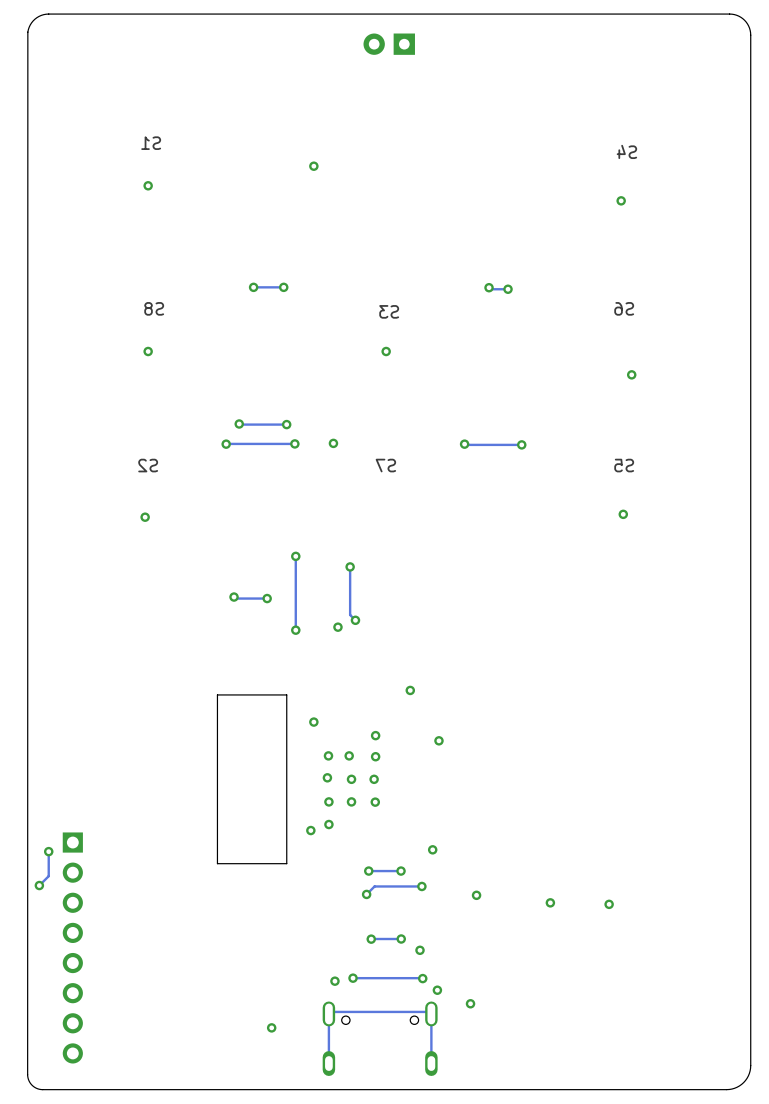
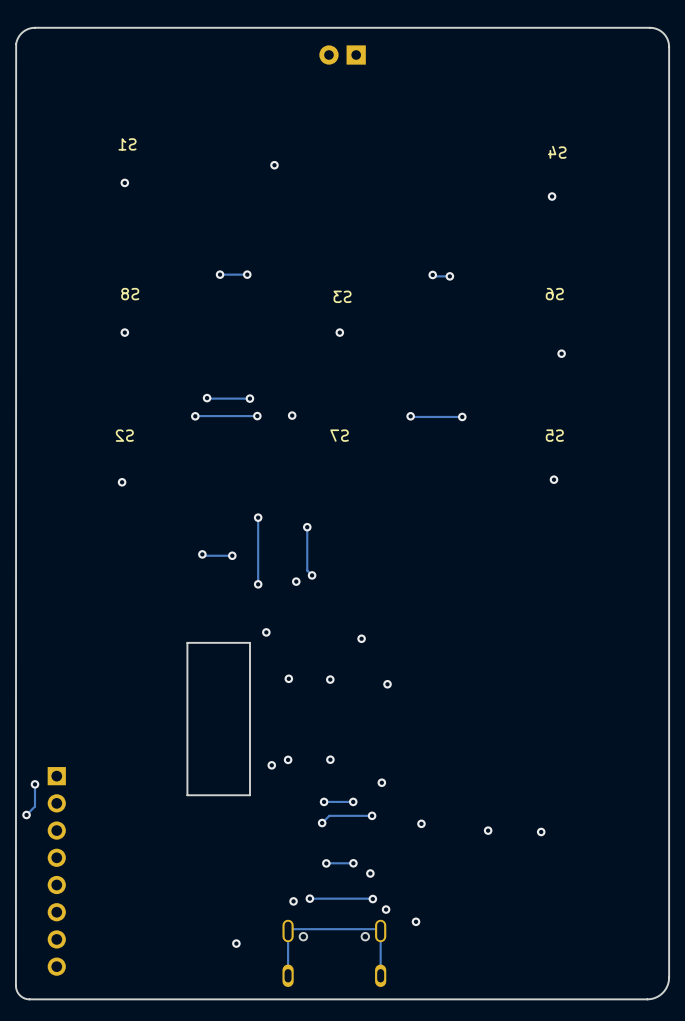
via: none -> (266, 632)
via: (313, 722) -> none
via: none -> (288, 678)
via: (328, 755) -> none
via: (349, 755) -> none
via: (375, 756) -> none
via: (327, 777) -> none
via: (351, 779) -> none
via: (374, 779) -> none
via: (328, 801) -> none
via: (351, 801) -> none
via: (375, 802) -> none
via: none -> (330, 759)

